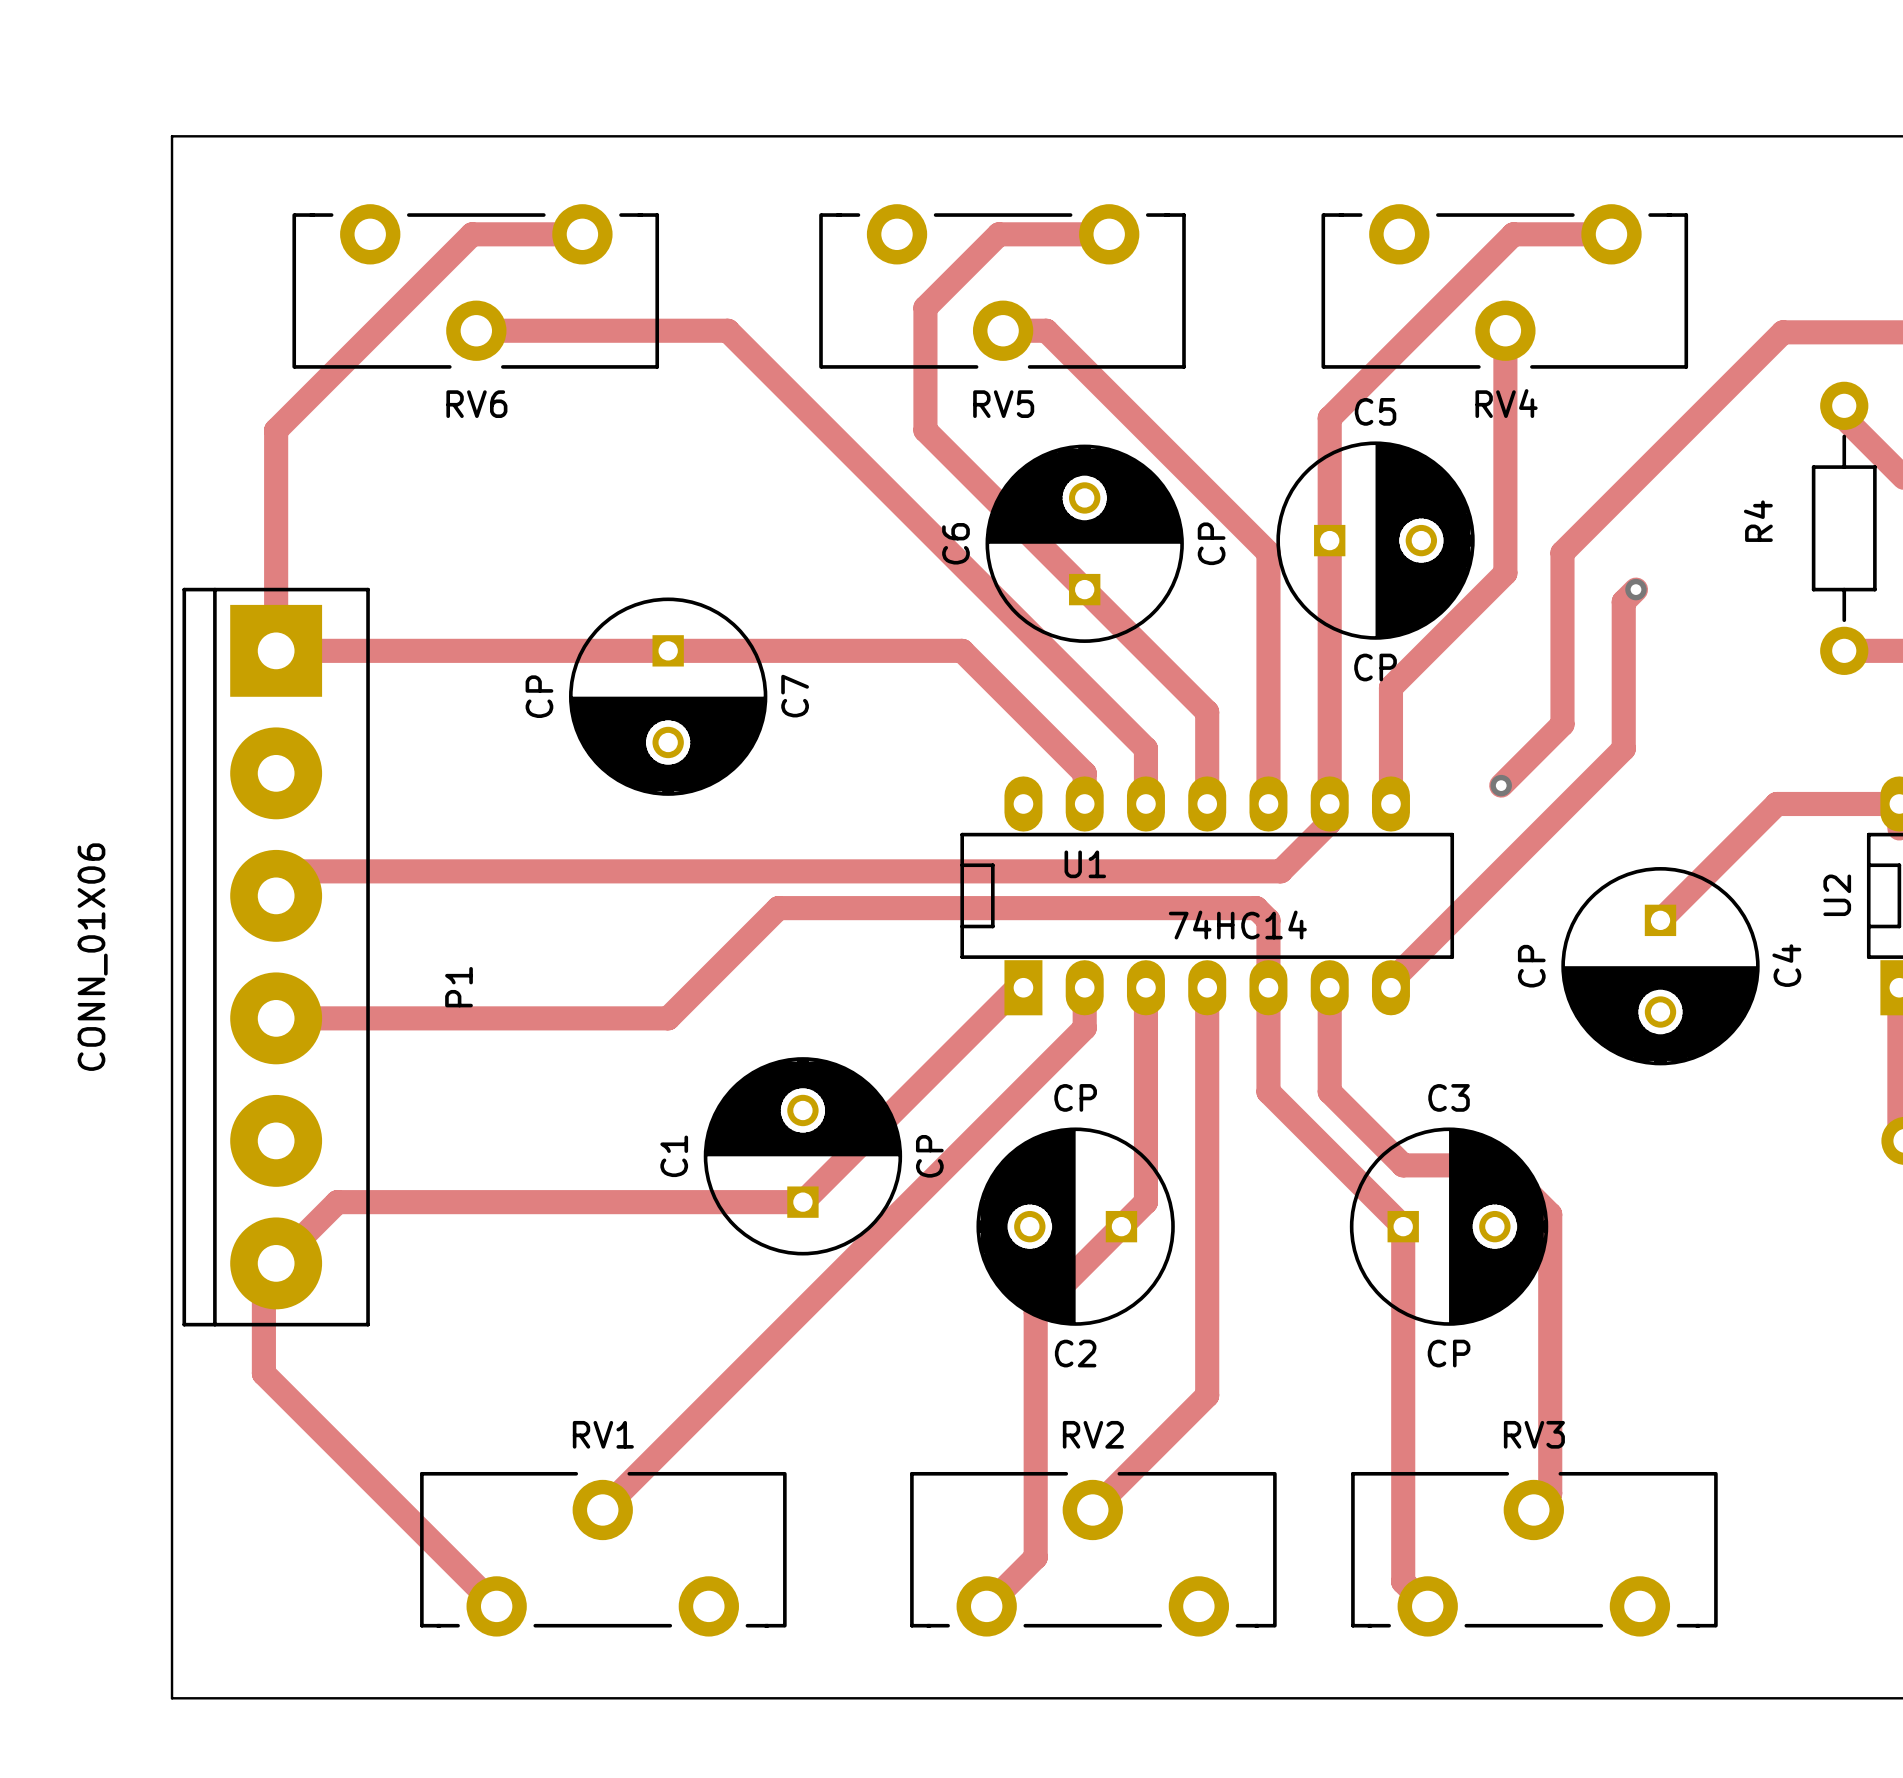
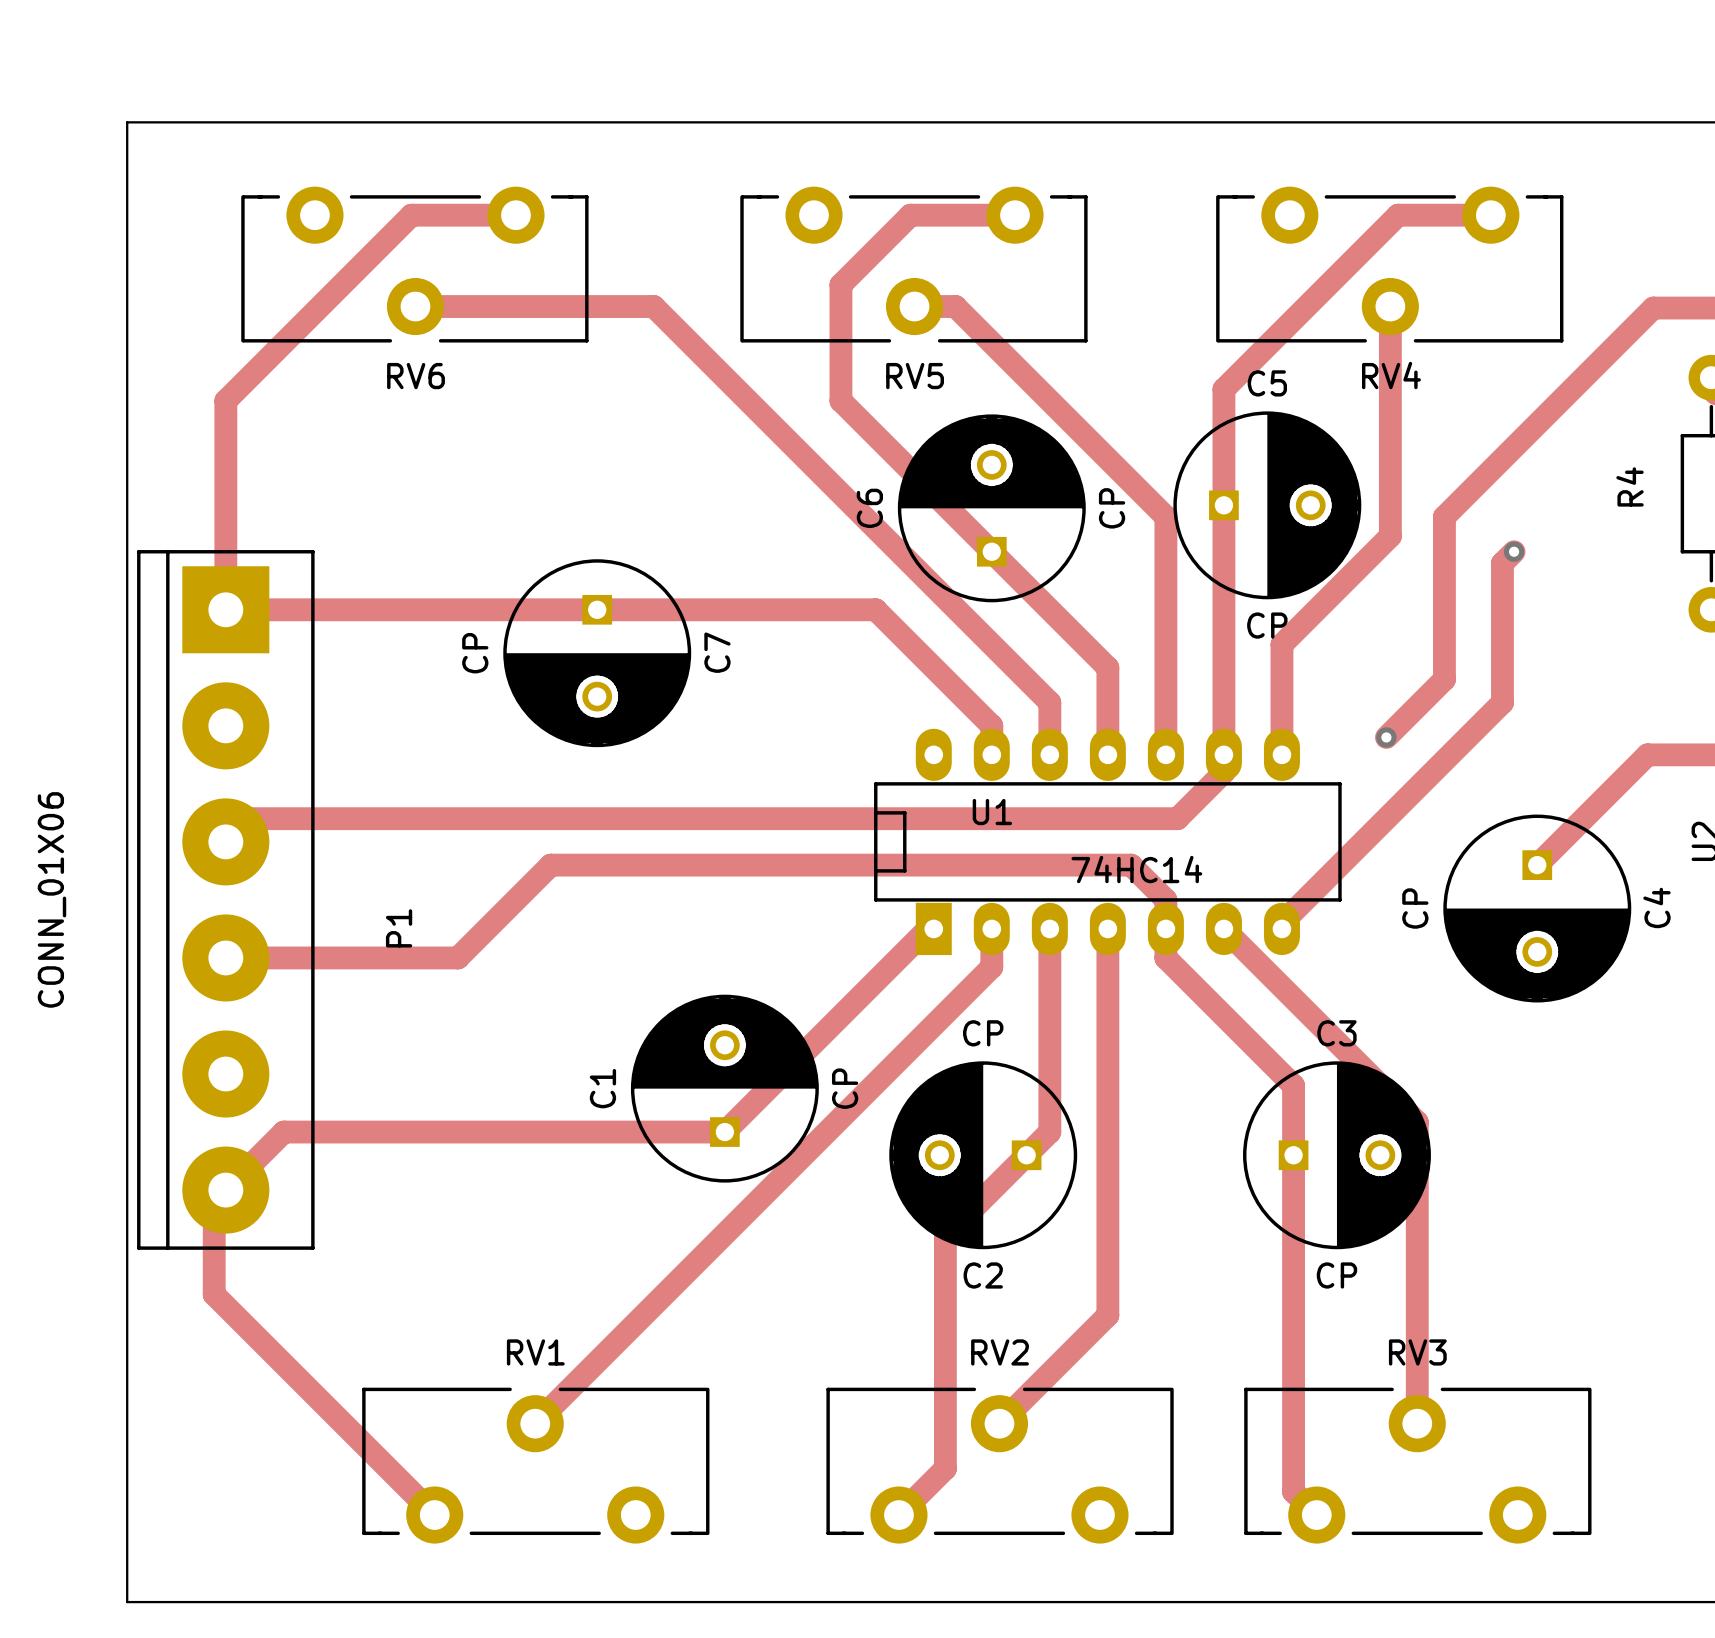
track: (1268, 957) (1268, 920) (1256, 908) (778, 908) (668, 1018) (521, 1018) -> (1165, 899) (1131, 865) (550, 865) (457, 957)
track: (1329, 987) (1329, 1091) (1403, 1165) (1501, 1165) (1550, 1214) (1550, 1493) (1533, 1510) -> (1223, 928) (1417, 1122) (1417, 1423)
track: (1268, 1018) (1268, 1091) (1403, 1226) -> (1165, 957) (1293, 1085) (1293, 1155)

